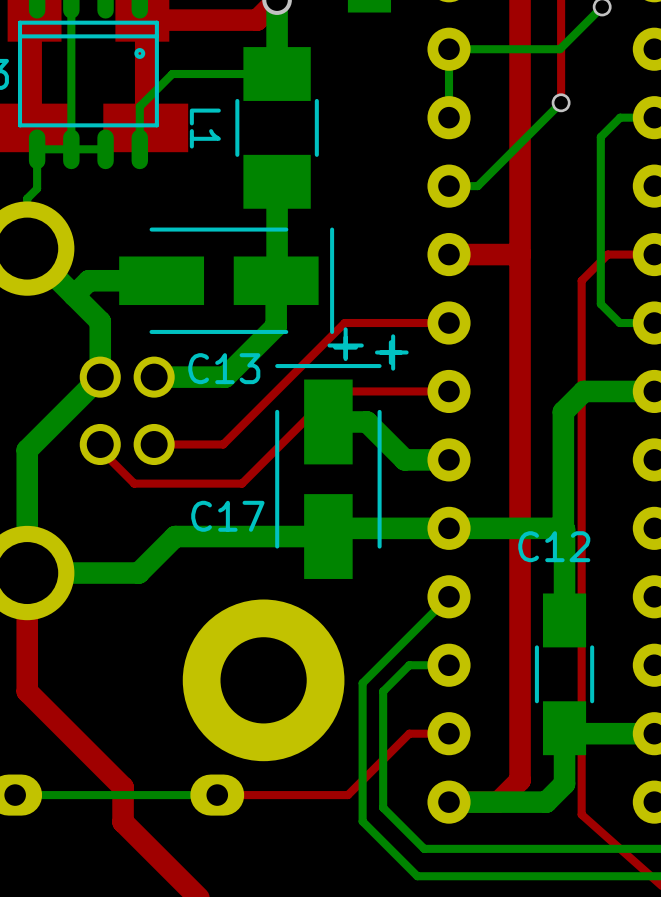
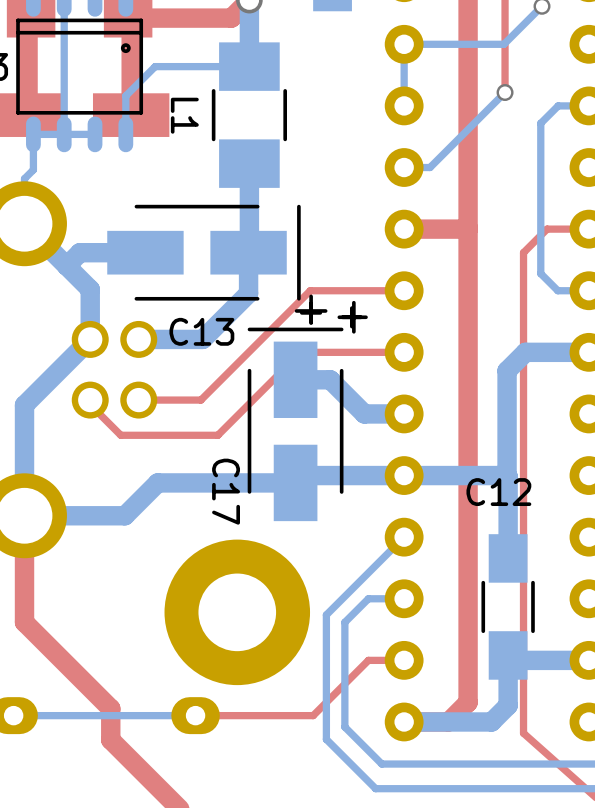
C17 name rotation: 0° (227, 516) -> 90° clockwise (226, 491)

